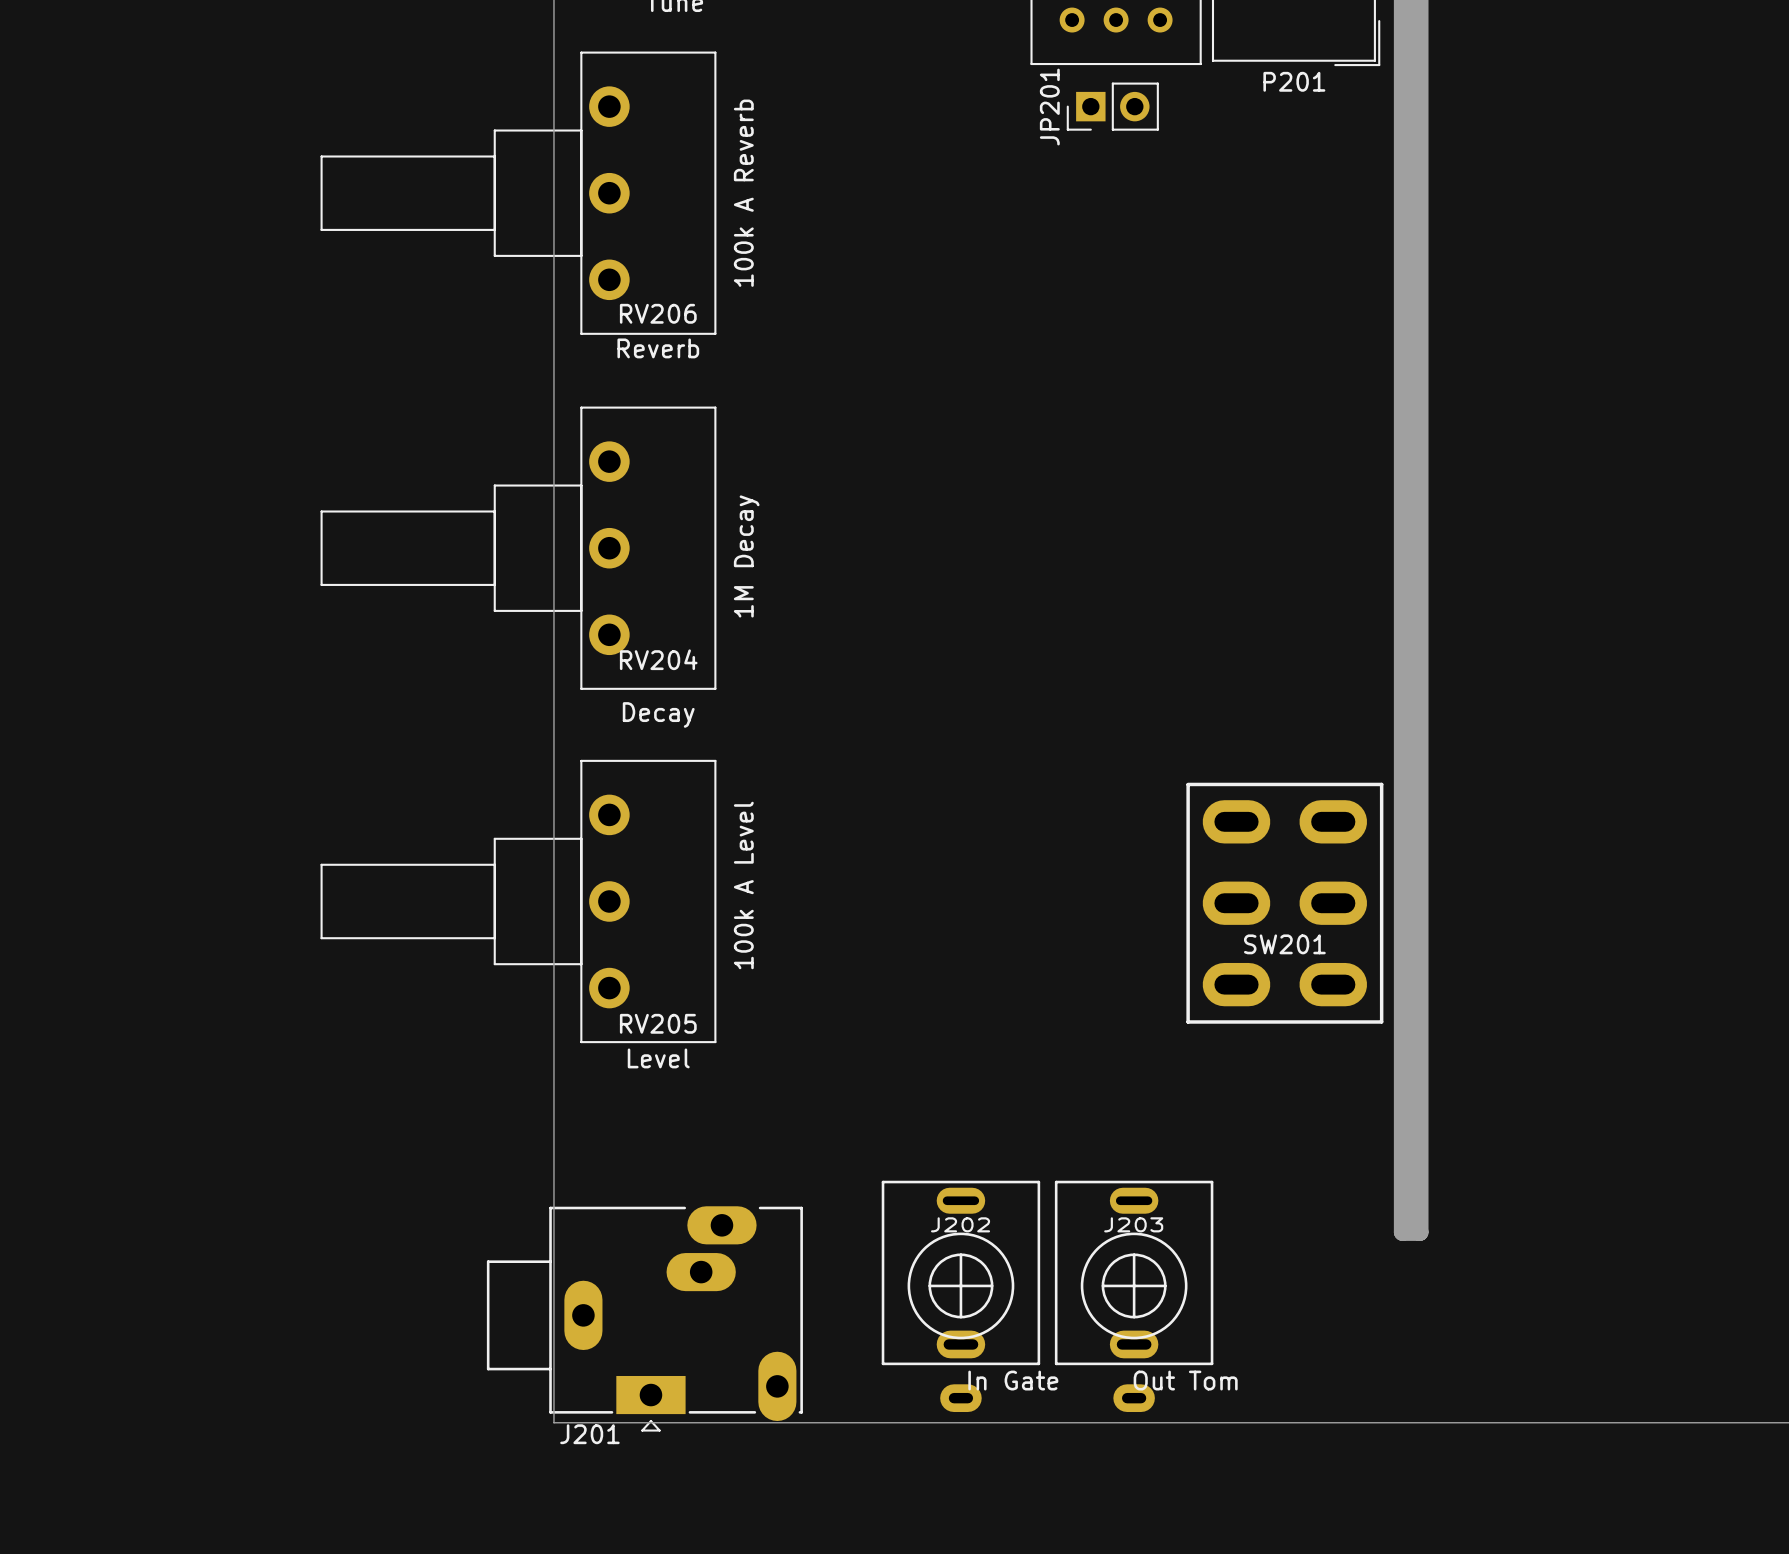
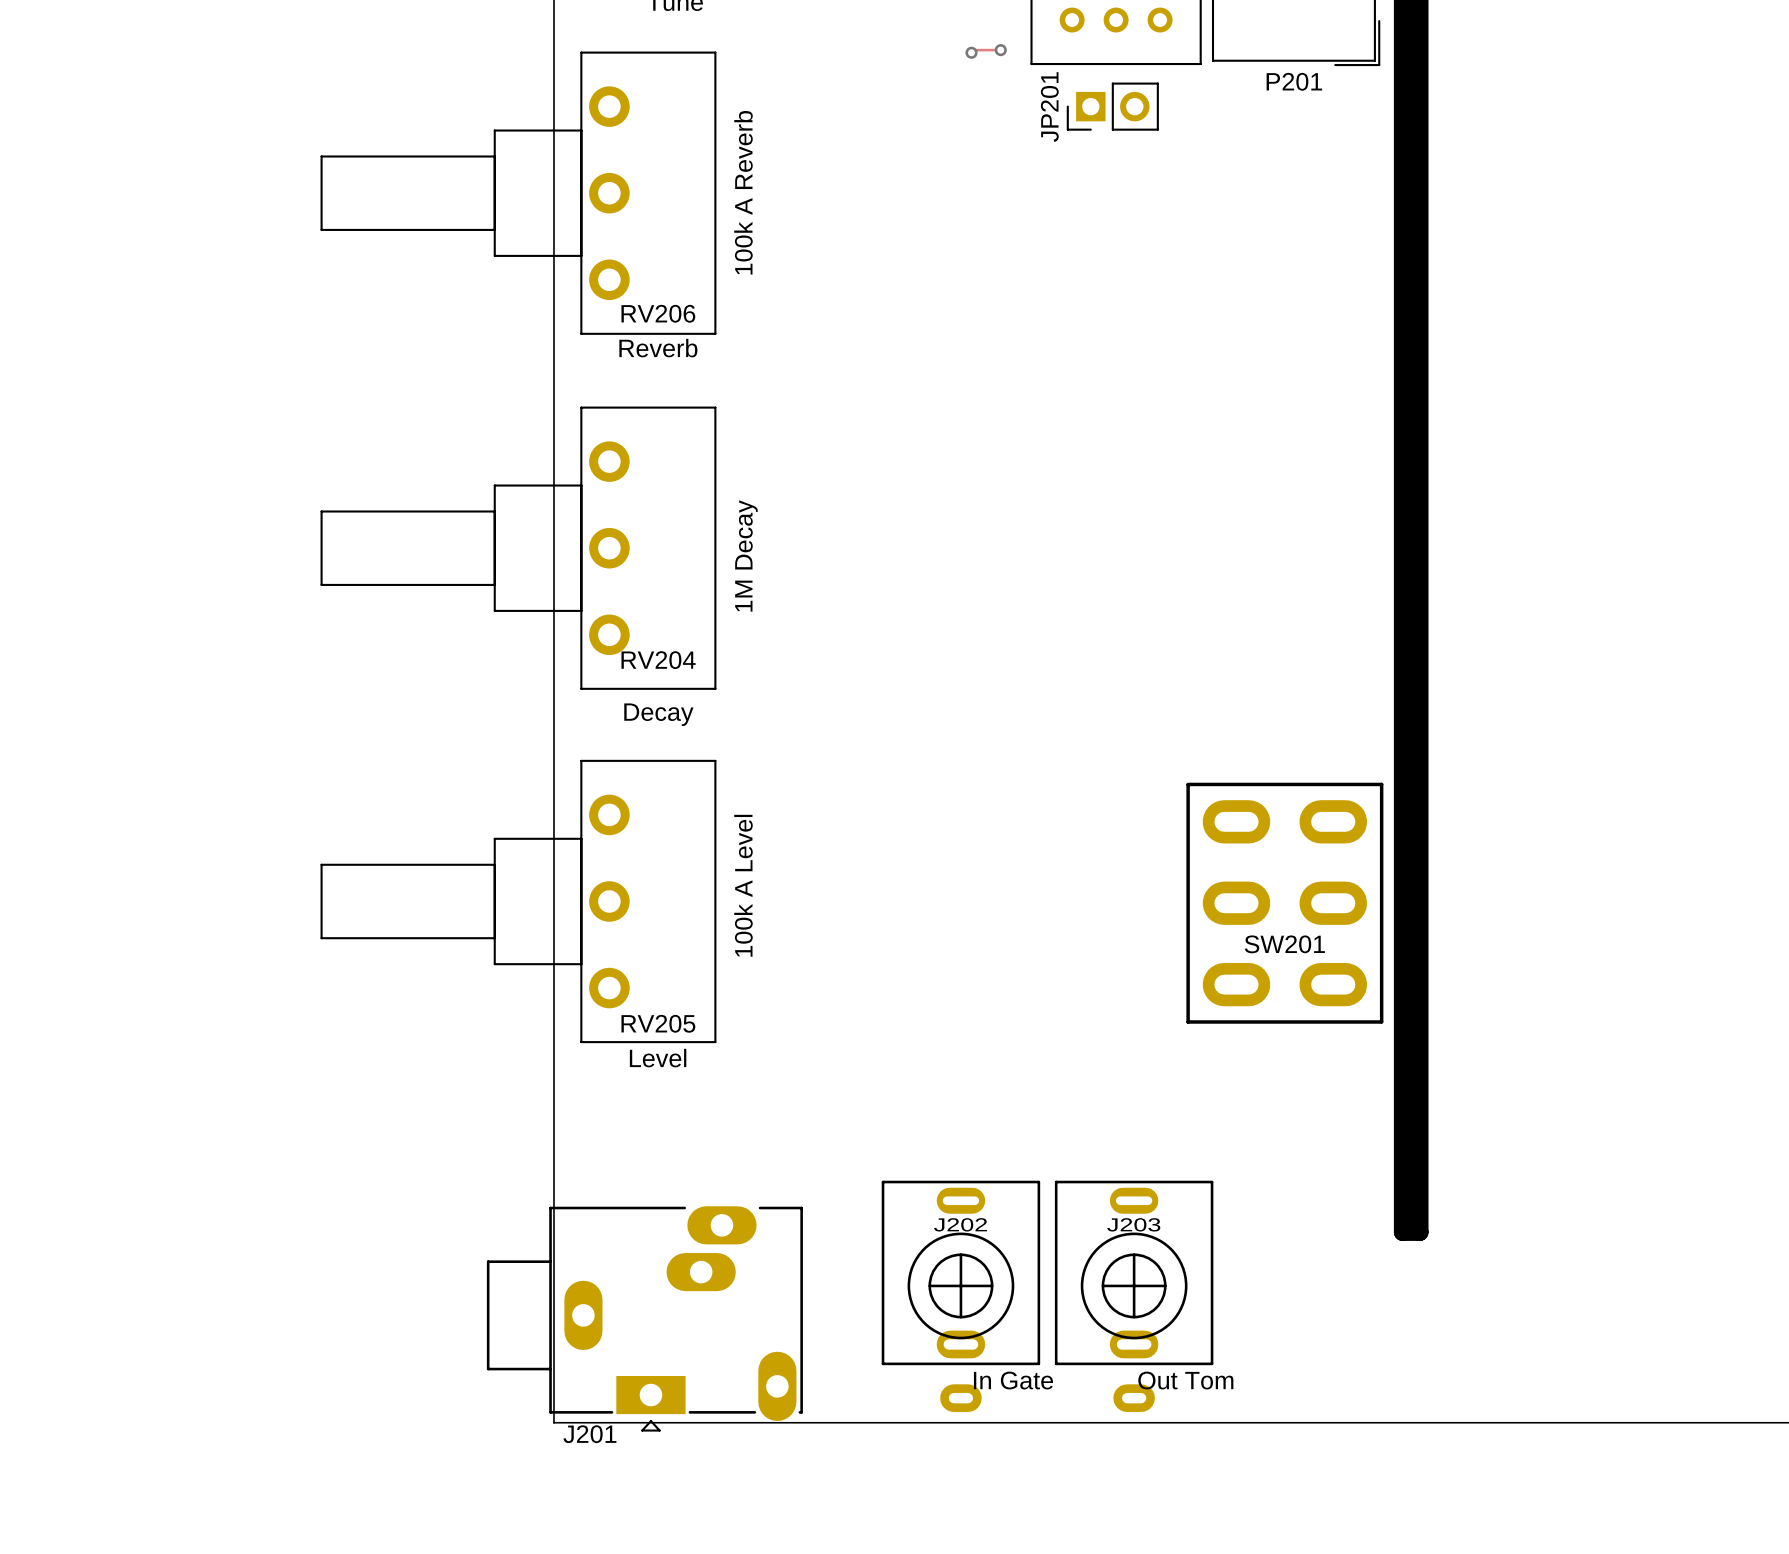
track: none -> (1000, 50) (974, 50) (971, 52)
via: none -> (1000, 50)
via: none -> (971, 52)

